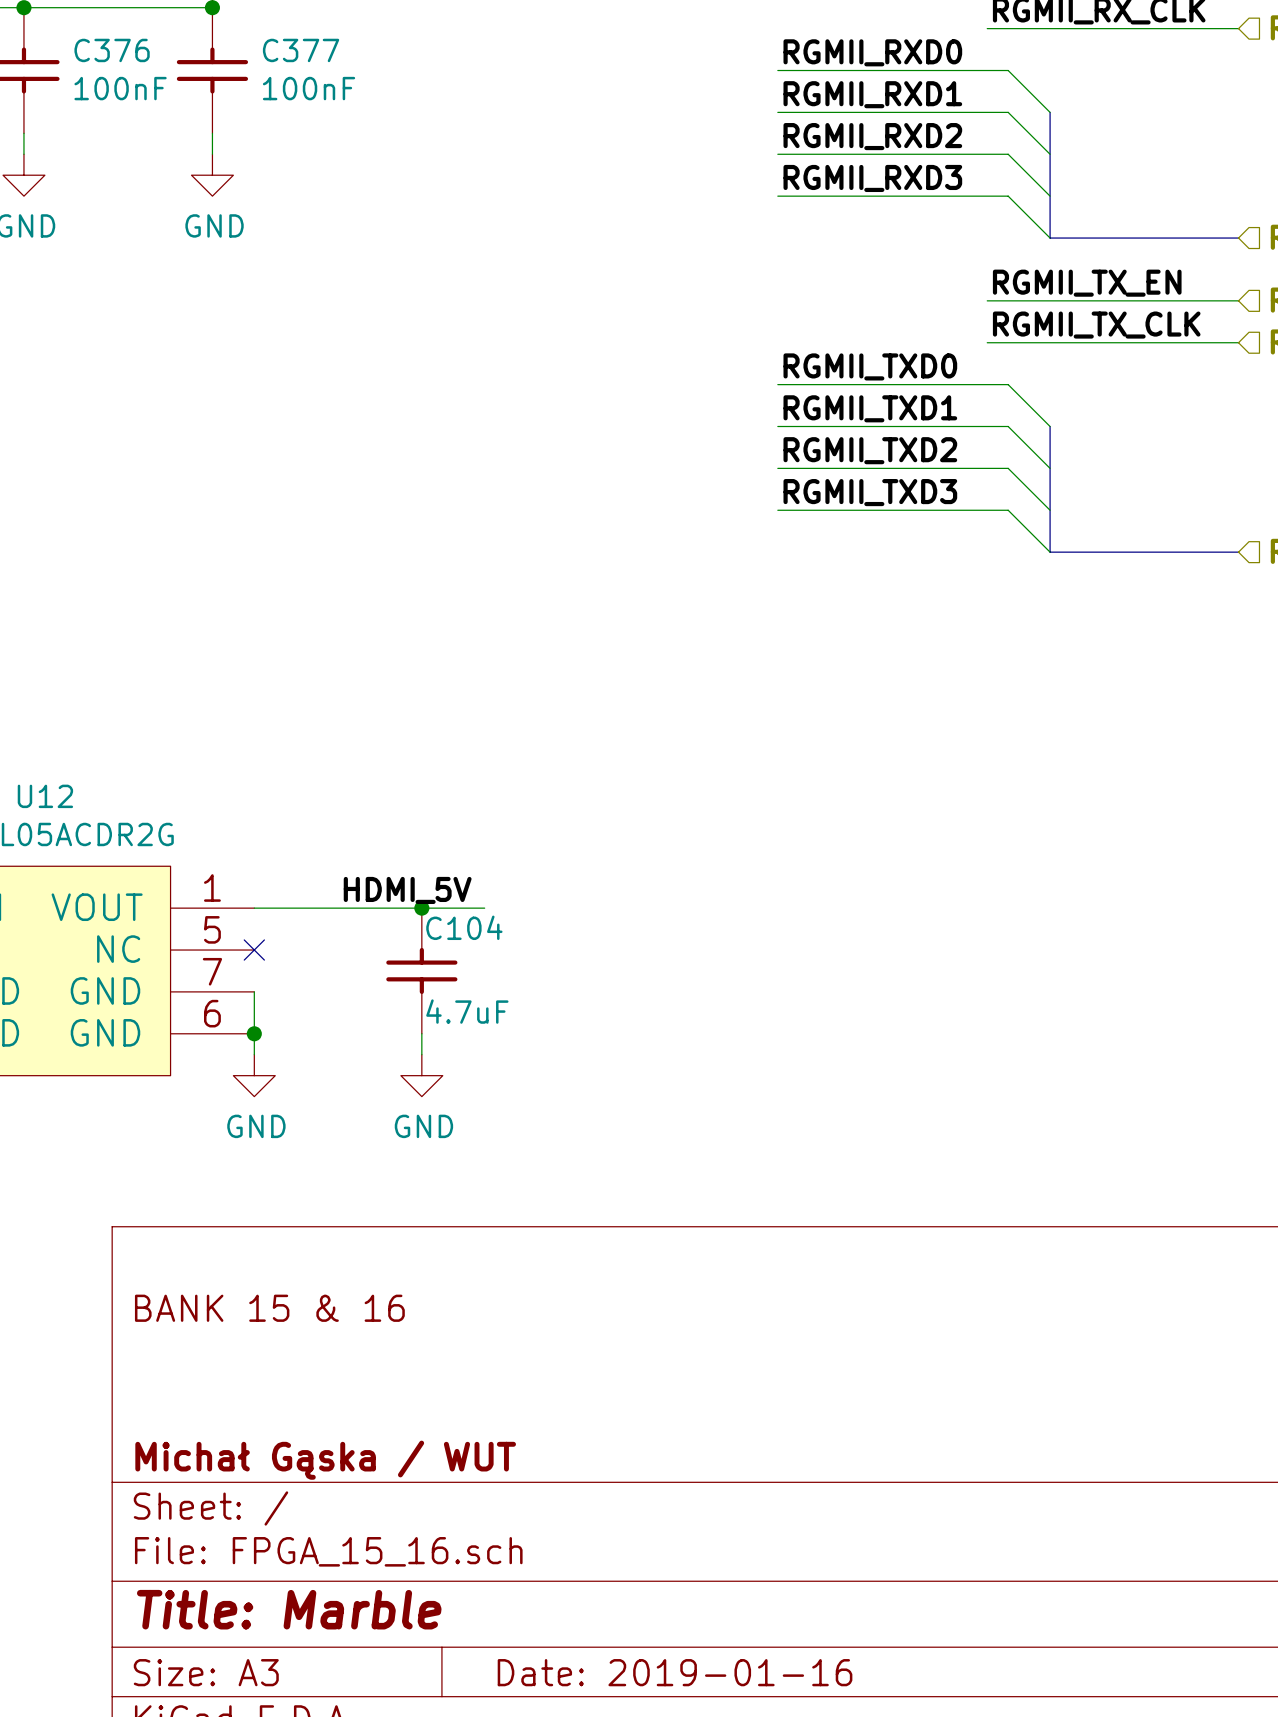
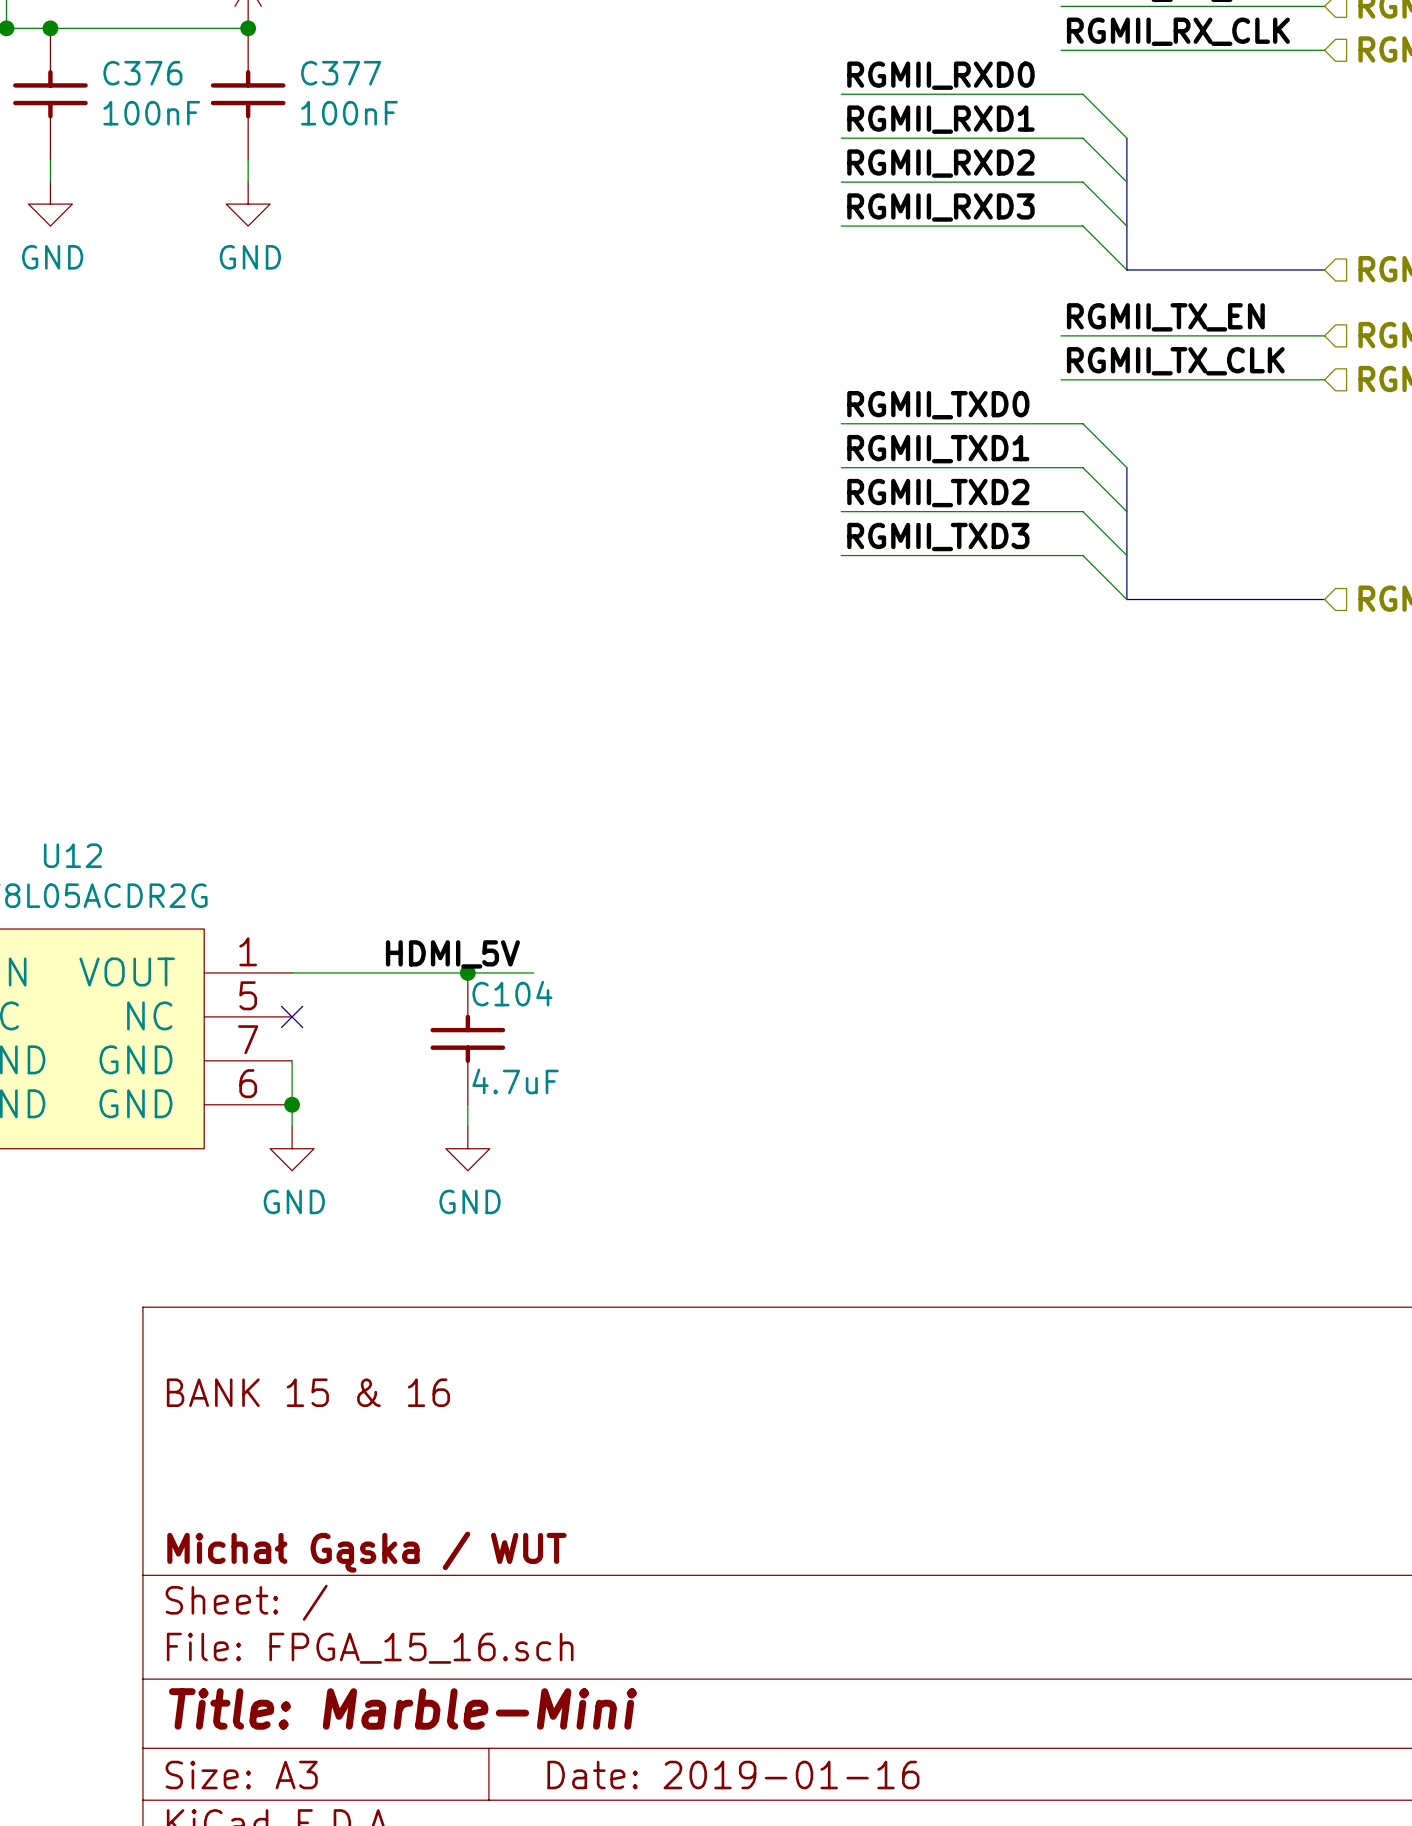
title block: Title: Marble (289, 1609) -> Title: Marble-Mini (402, 1708)

